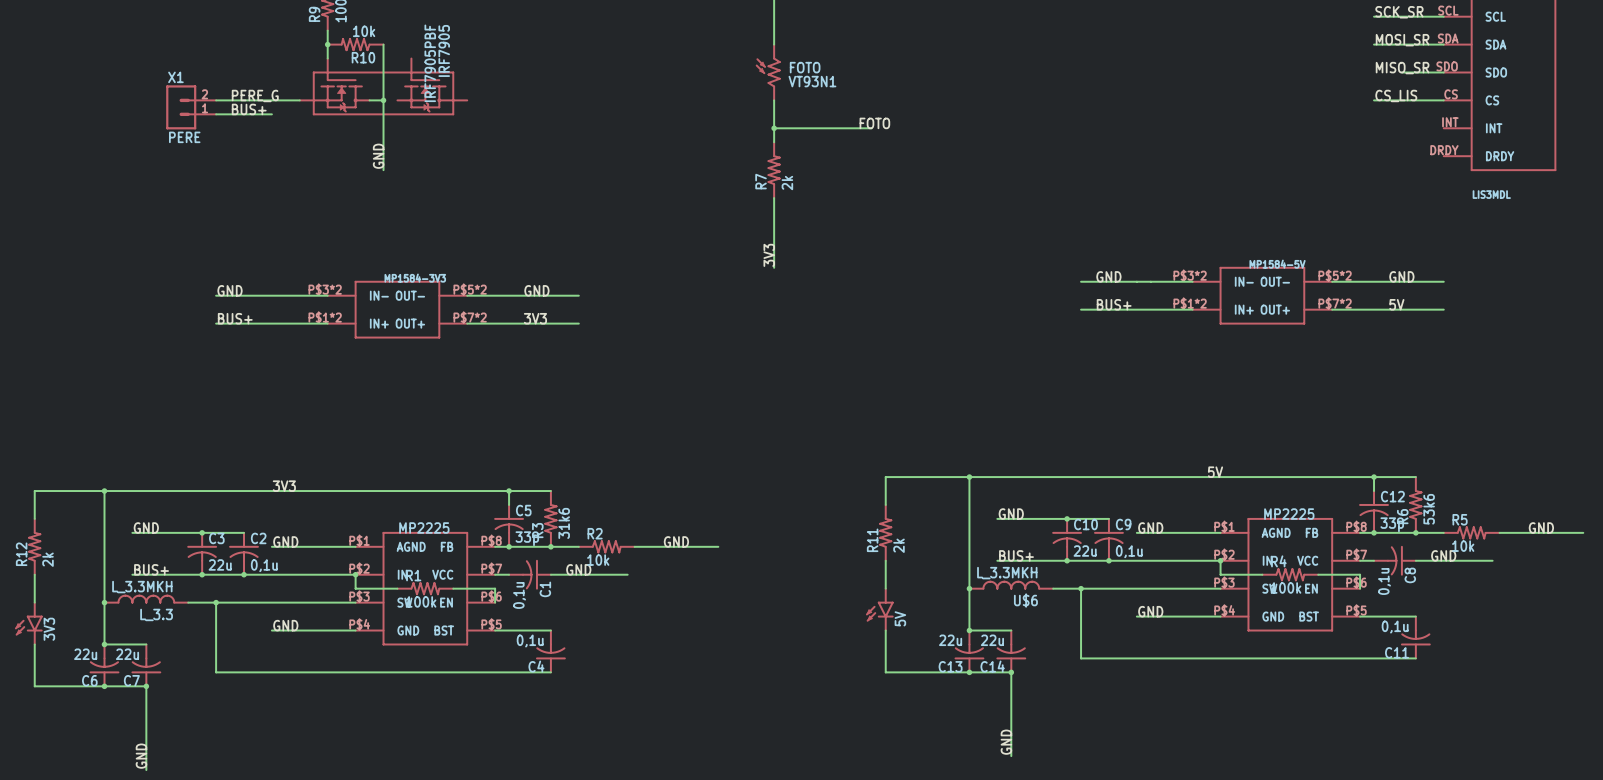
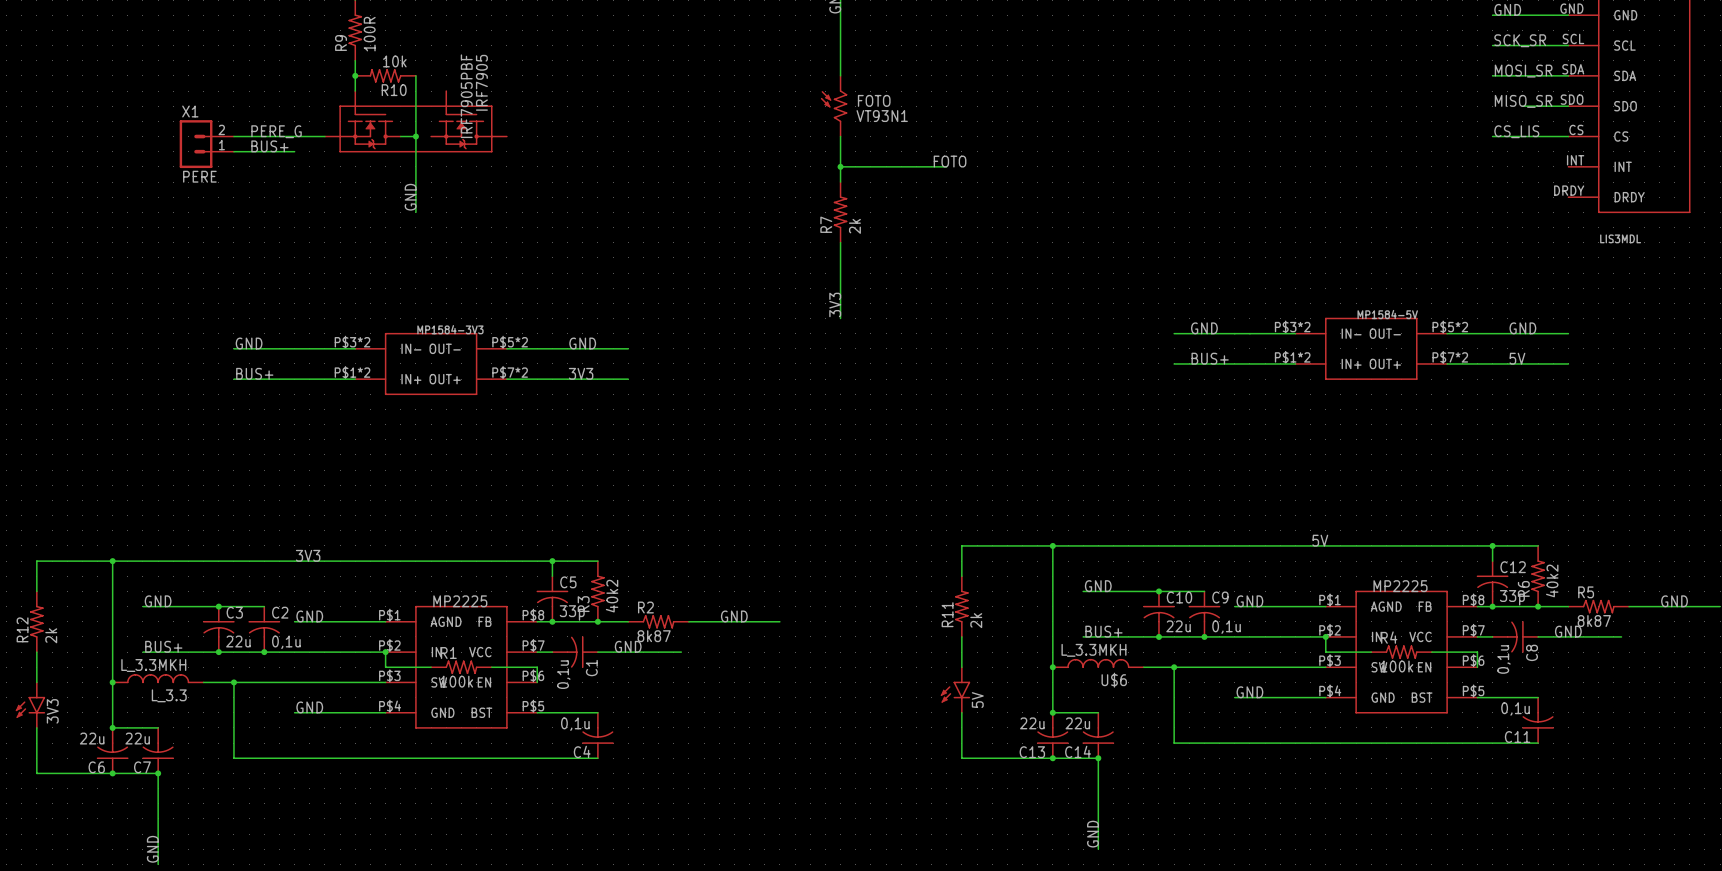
R6 value: 53k6 (1429, 509) -> 40k2 (1552, 580)
R3 value: 31k6 (564, 523) -> 40k2 (612, 596)
R5 value: 10k (1463, 546) -> 8k87 (1594, 621)
R2 value: 10k (598, 560) -> 8k87 (654, 636)

